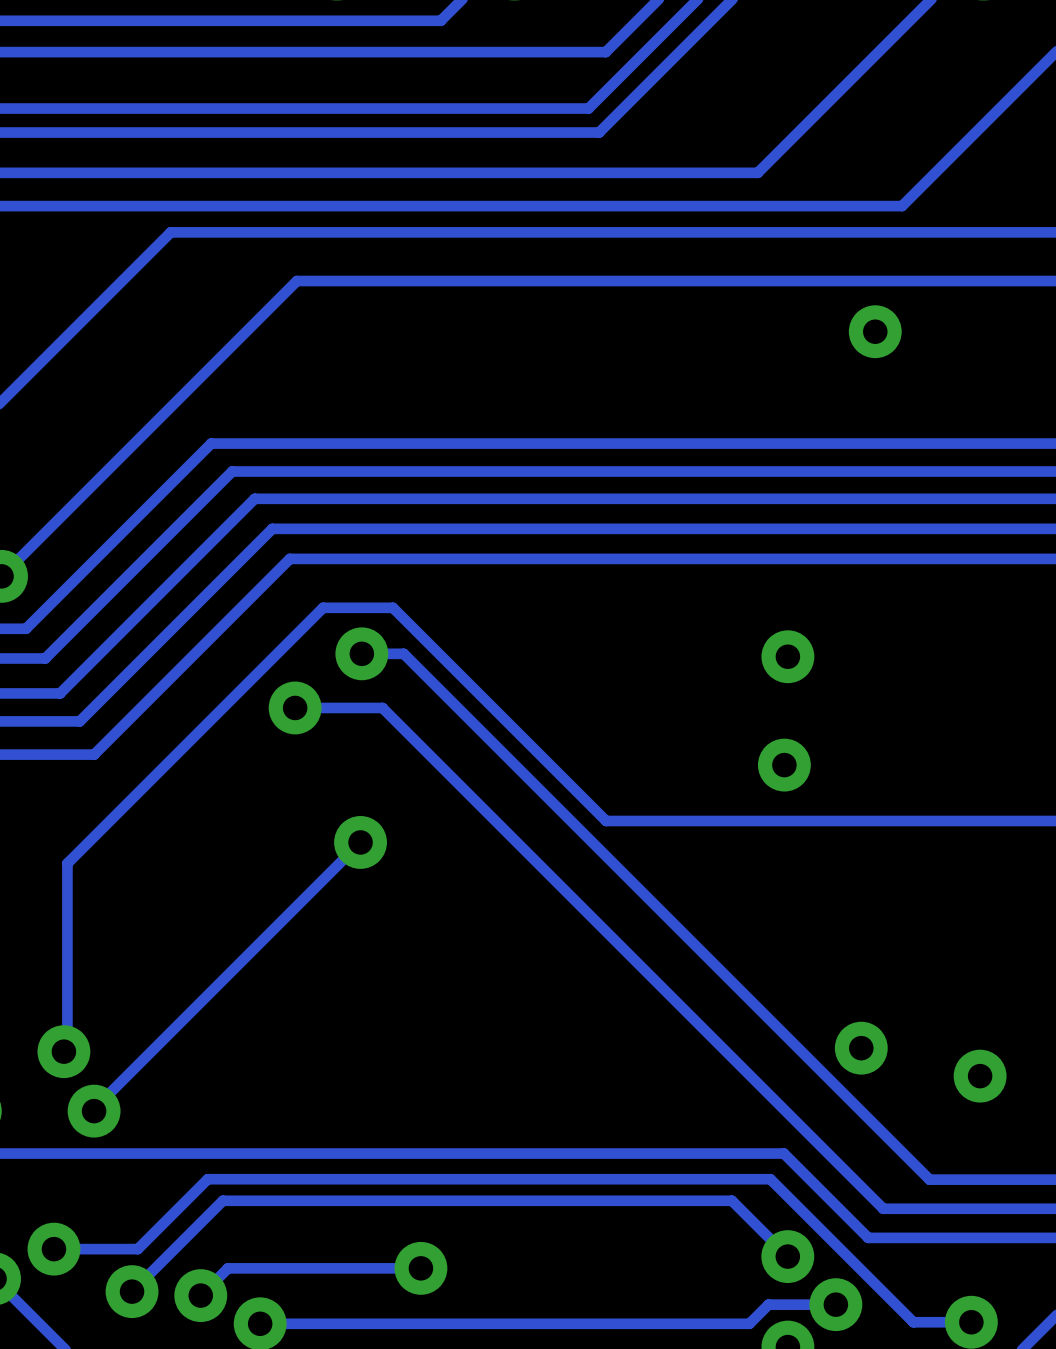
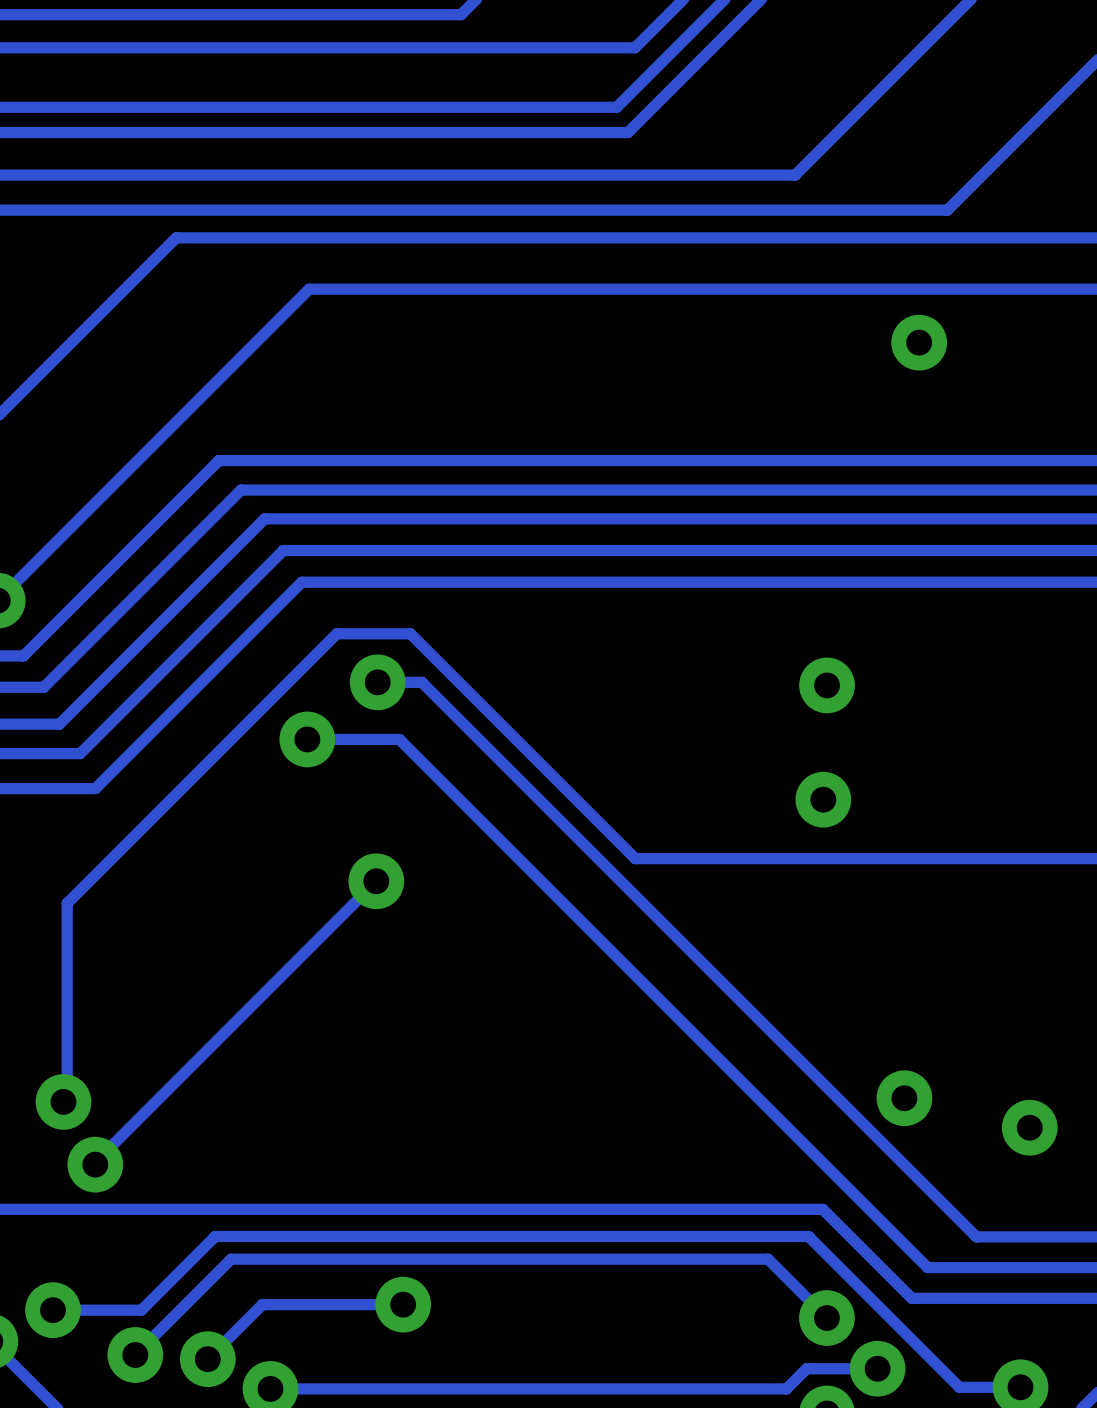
track: (420, 1268) (228, 1268) -> (403, 1304) (262, 1304) (236, 1330)
via position: (420, 1268) -> (403, 1304)

